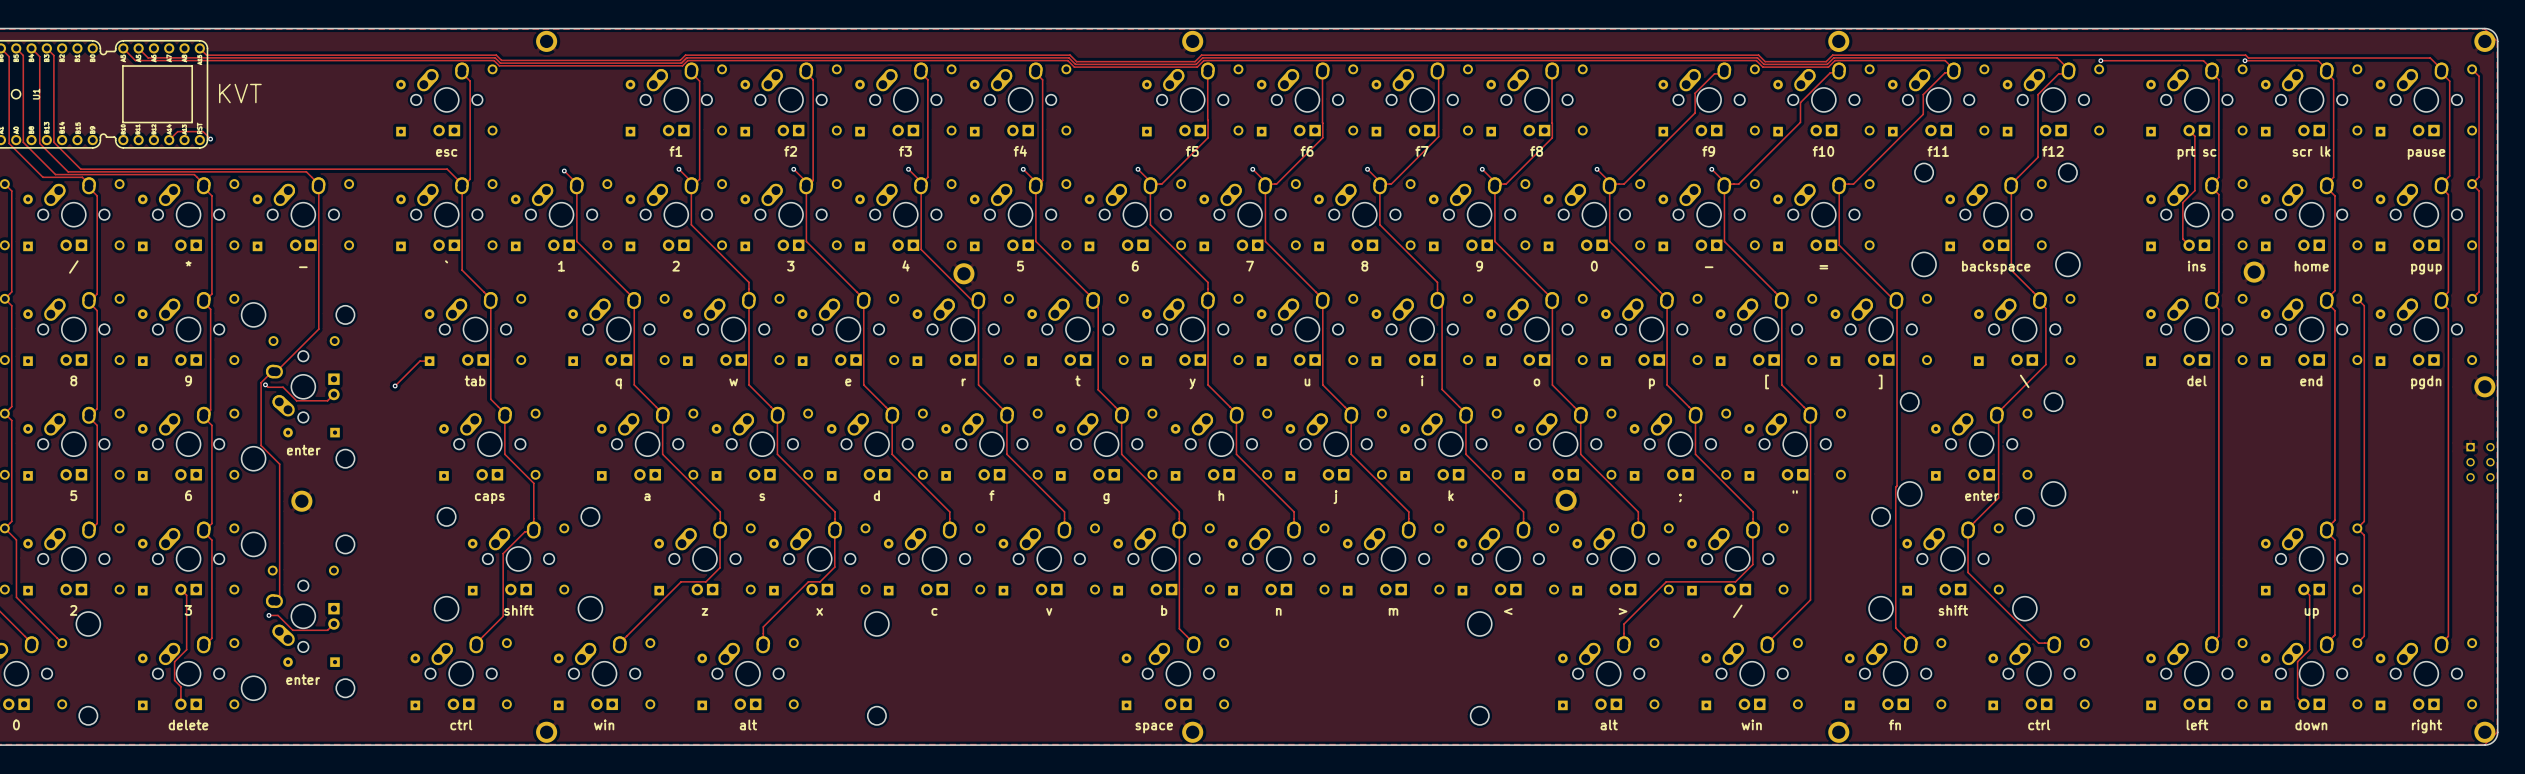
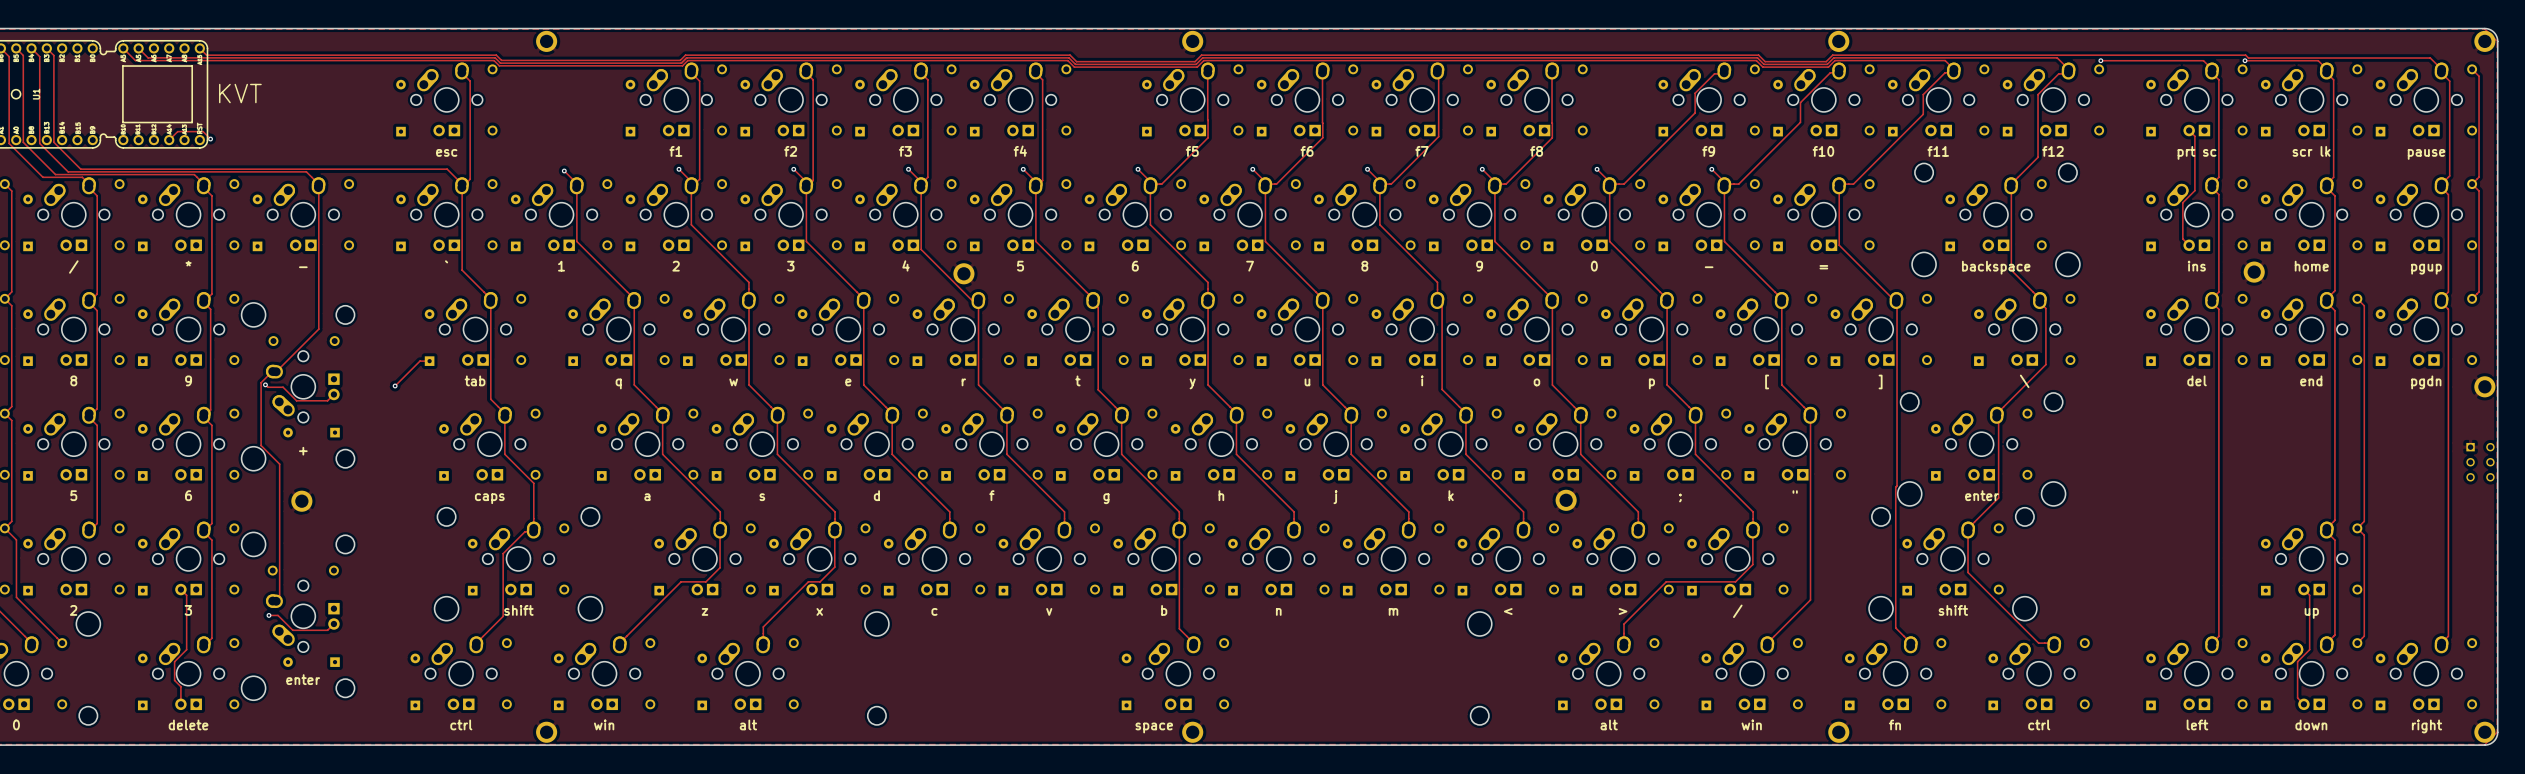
text: enter (303, 450) -> + (303, 451)

